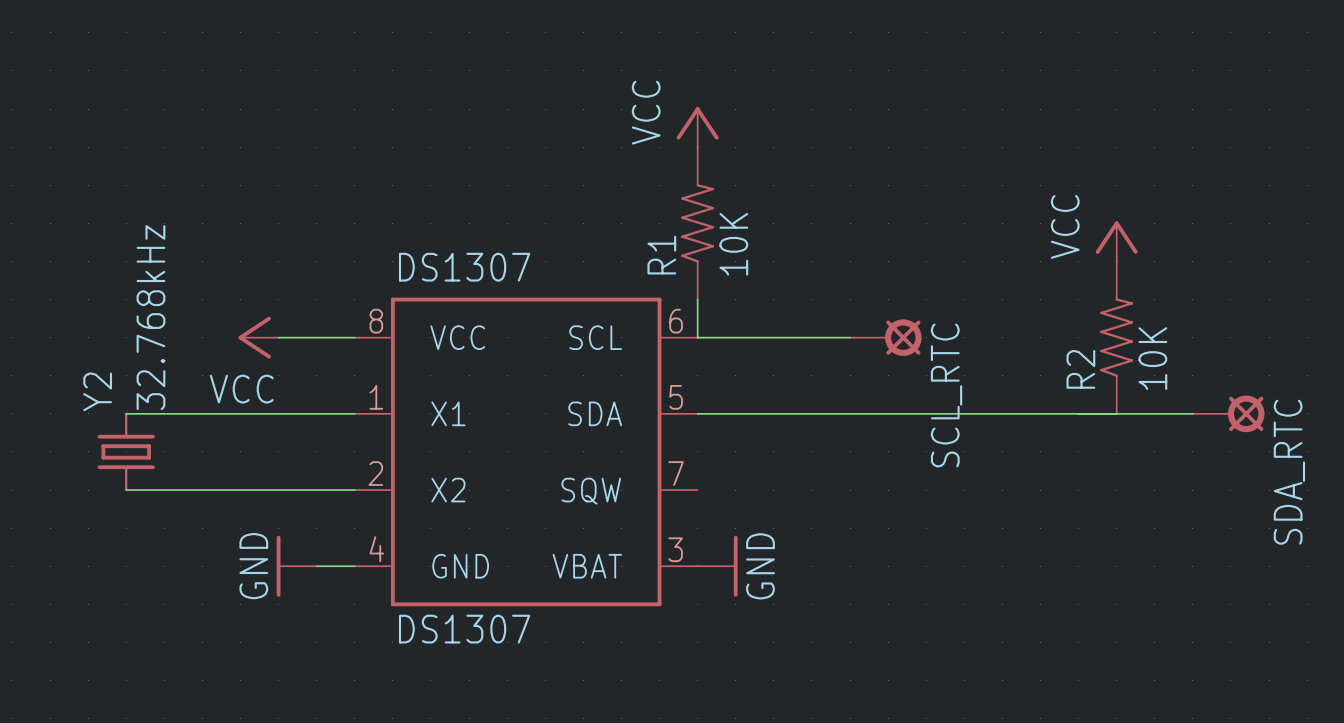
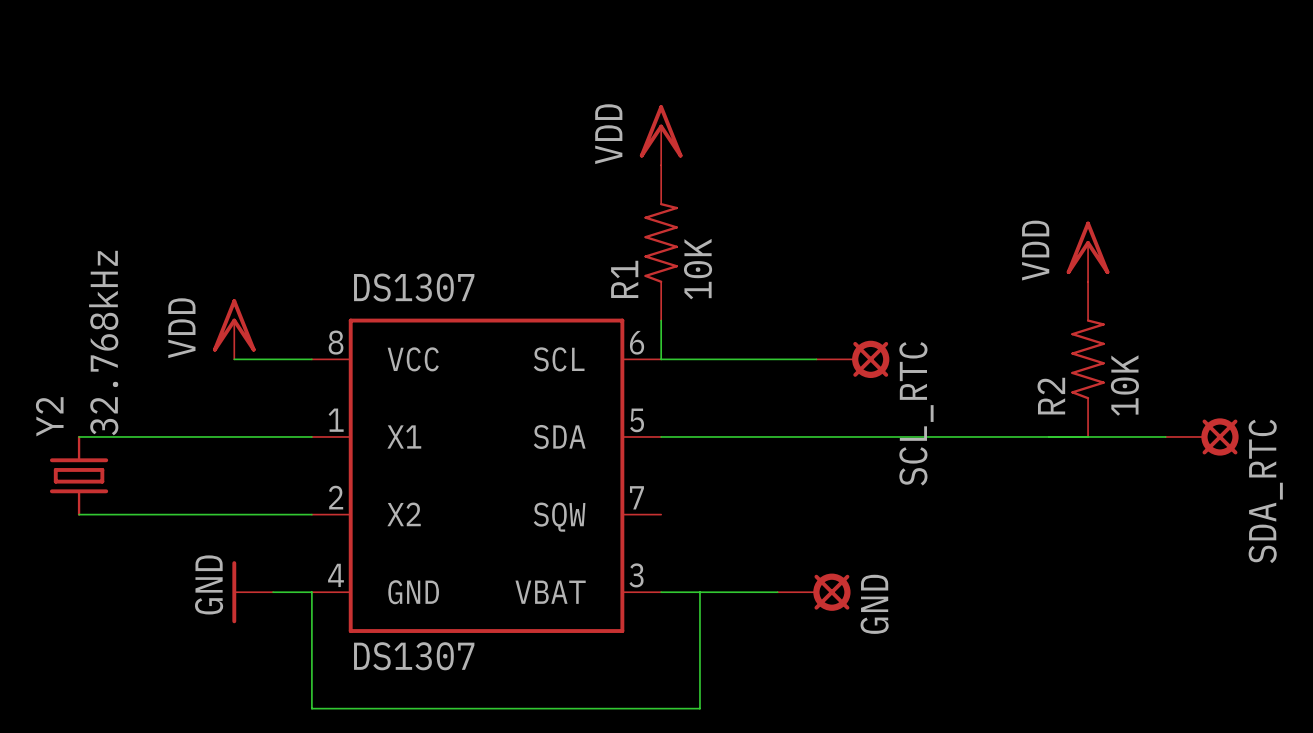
power symbol: VCC (697, 127) -> VDD (661, 135)
power symbol: VCC (1116, 241) -> VDD (1088, 251)
power symbol: none -> VDD (234, 329)
power symbol: VCC (258, 337) -> none
wire: none -> (311, 592) (311, 708) (699, 708) (699, 592)
wire: none -> (661, 592) (777, 592)
power symbol: GND (717, 566) -> none
GND: none -> (814, 592)

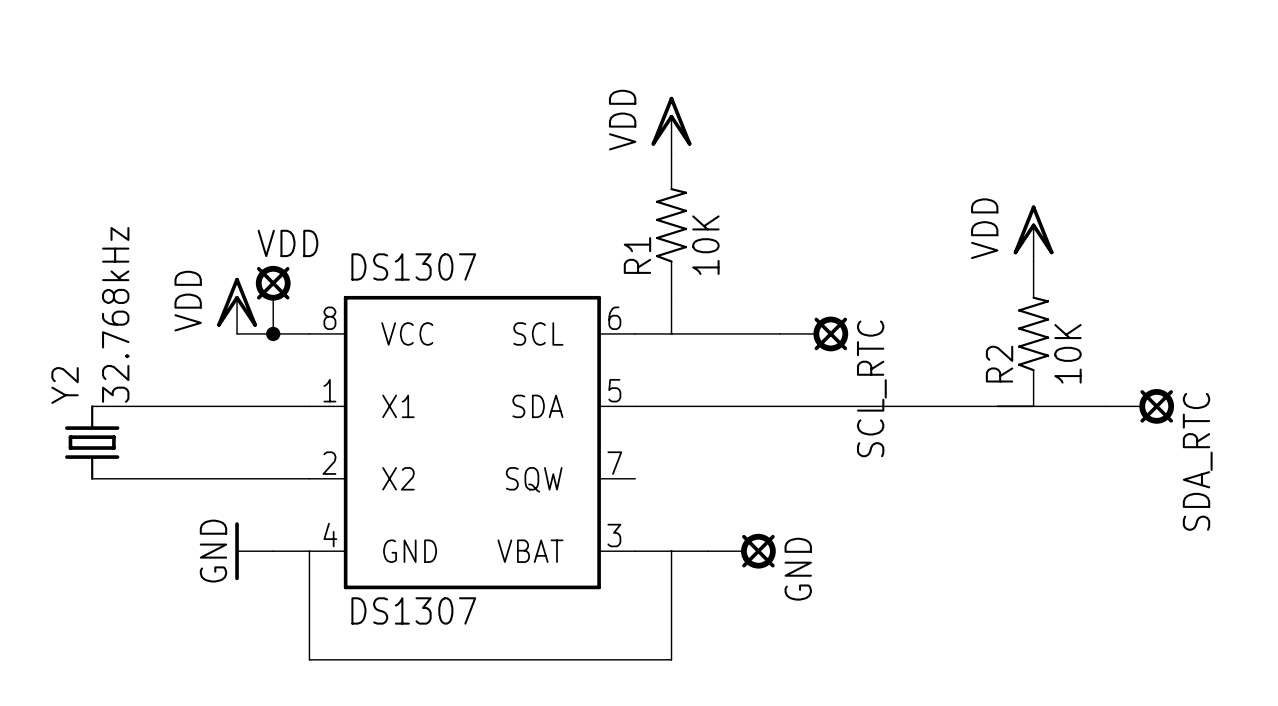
power symbol position: VDD (661, 135) -> VDD (671, 124)
R1 position: (661, 242) -> (671, 225)
wire: (661, 320) (661, 359) -> (671, 297) (671, 333)
VDD: none -> (273, 299)
junction: none -> (273, 333)
GND position: (814, 592) -> (741, 551)

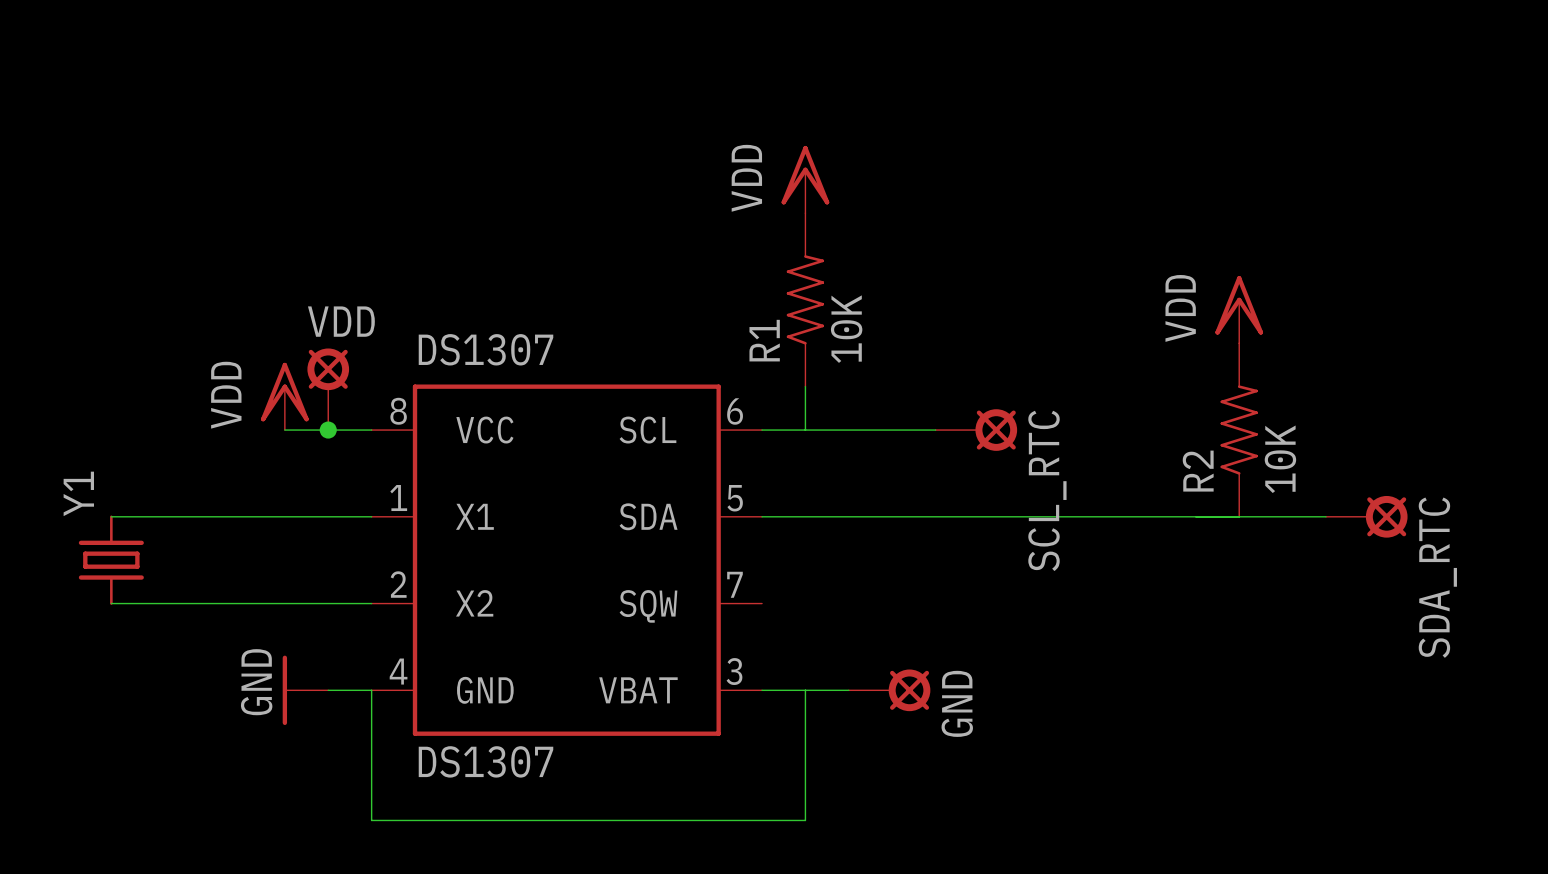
Y2 value: 32.768kHz (115, 314) -> none
Y2 name: Y2 (65, 385) -> Y1 (78, 493)

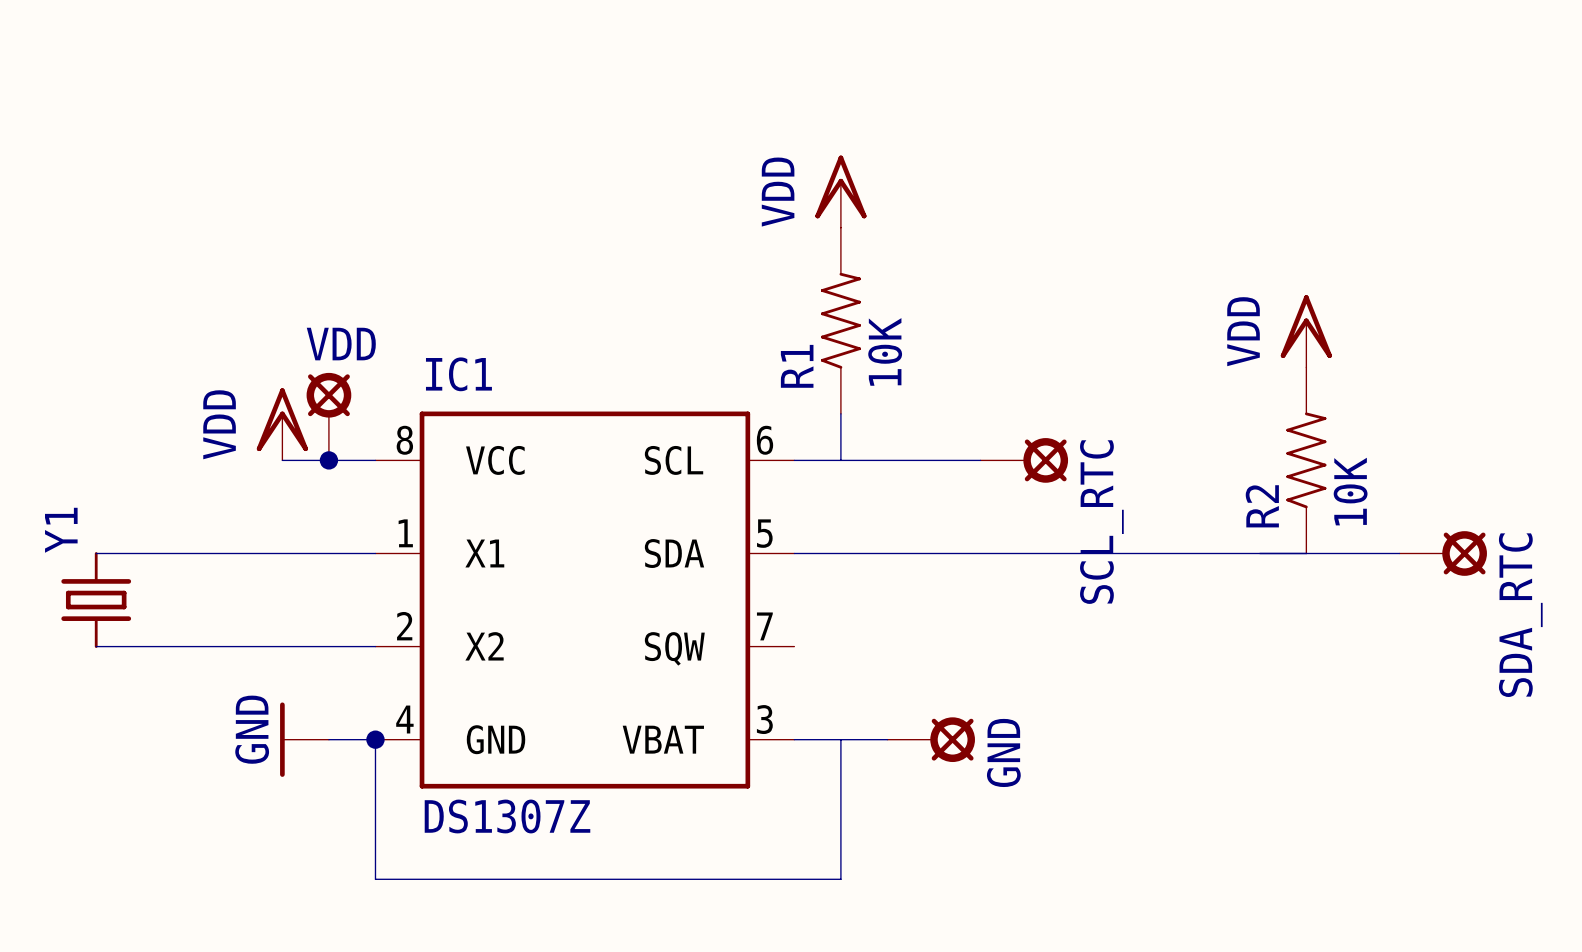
DS1307 name: DS1307 (485, 349) -> IC1 (458, 374)
junction: none -> (375, 739)
DS1307 value: DS1307 (485, 761) -> DS1307Z (507, 816)

